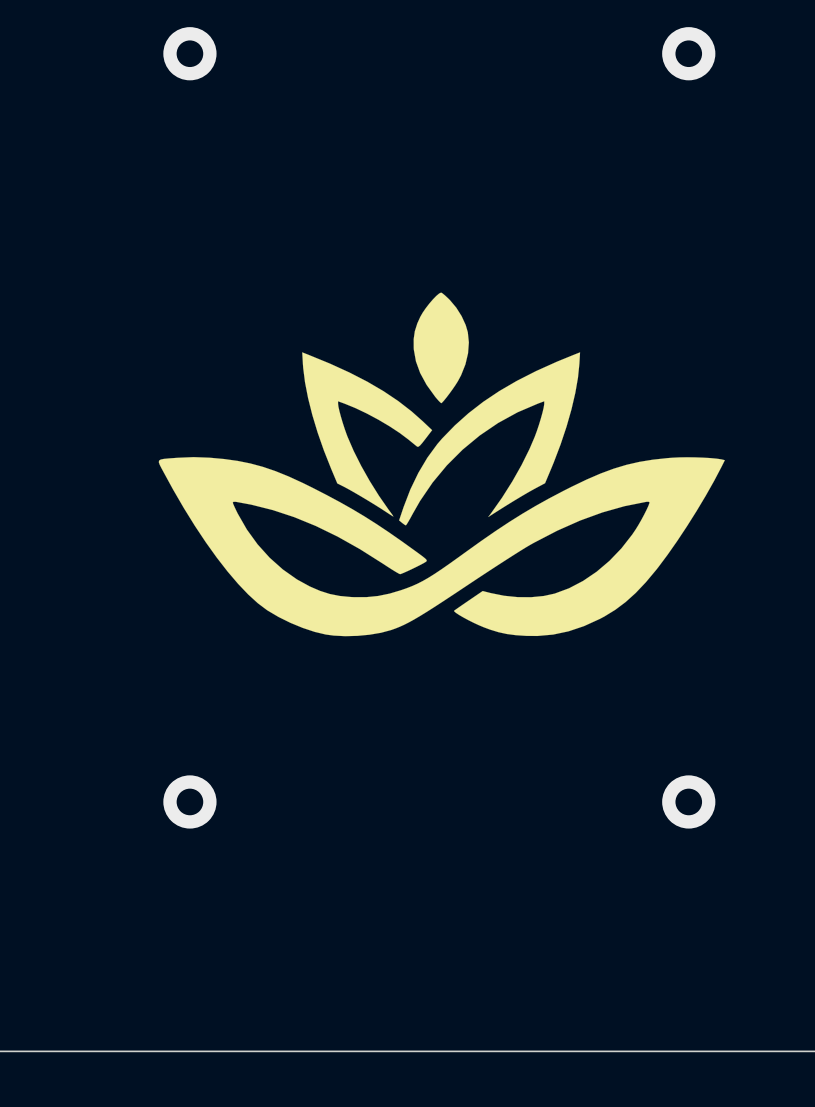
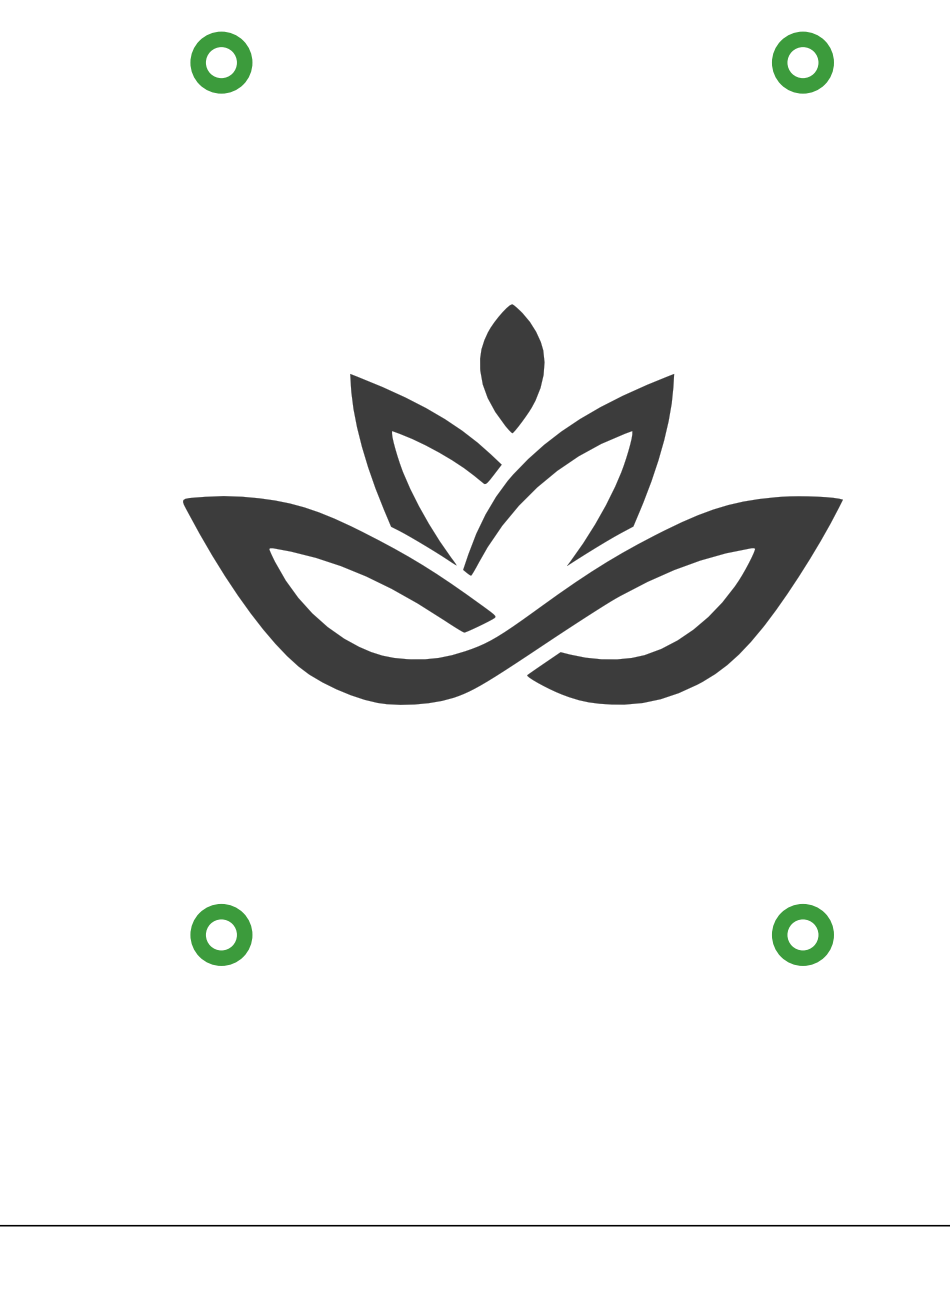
drawing position: (441, 464) -> (512, 504)

